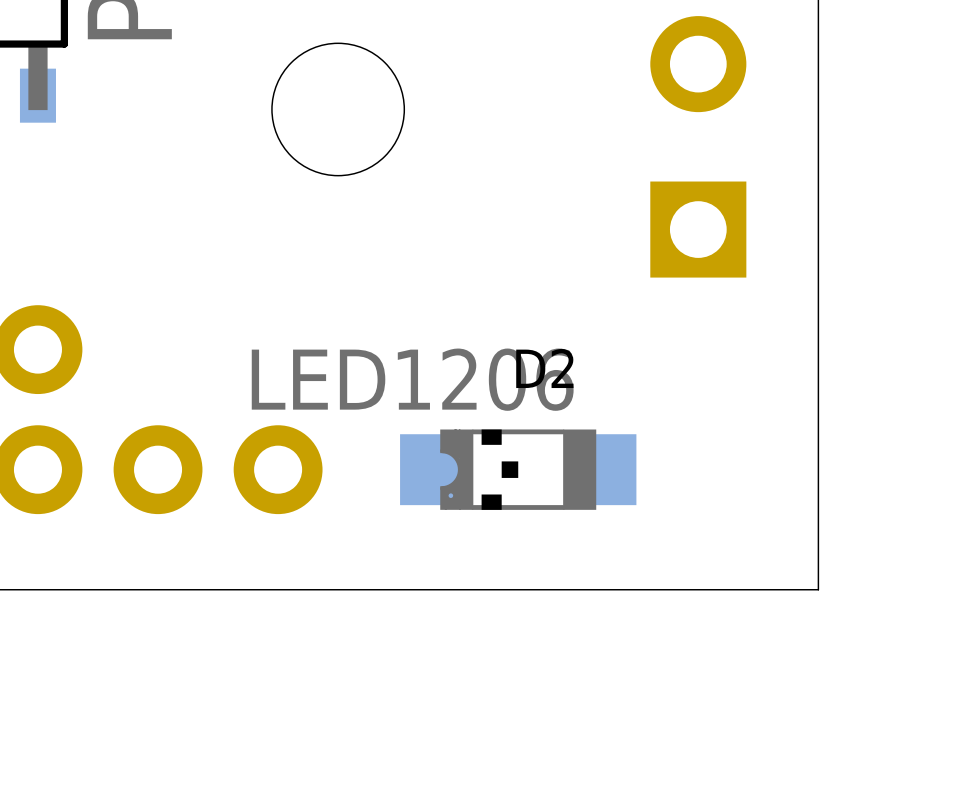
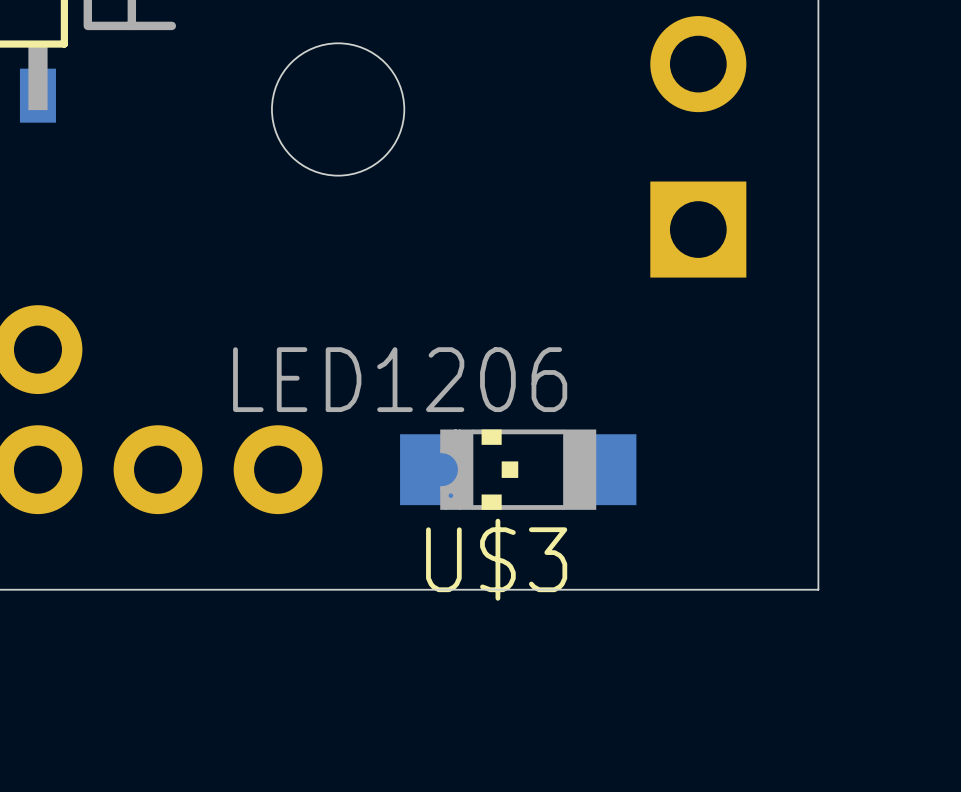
D2 name: D2 (544, 368) -> U$3 (496, 559)

